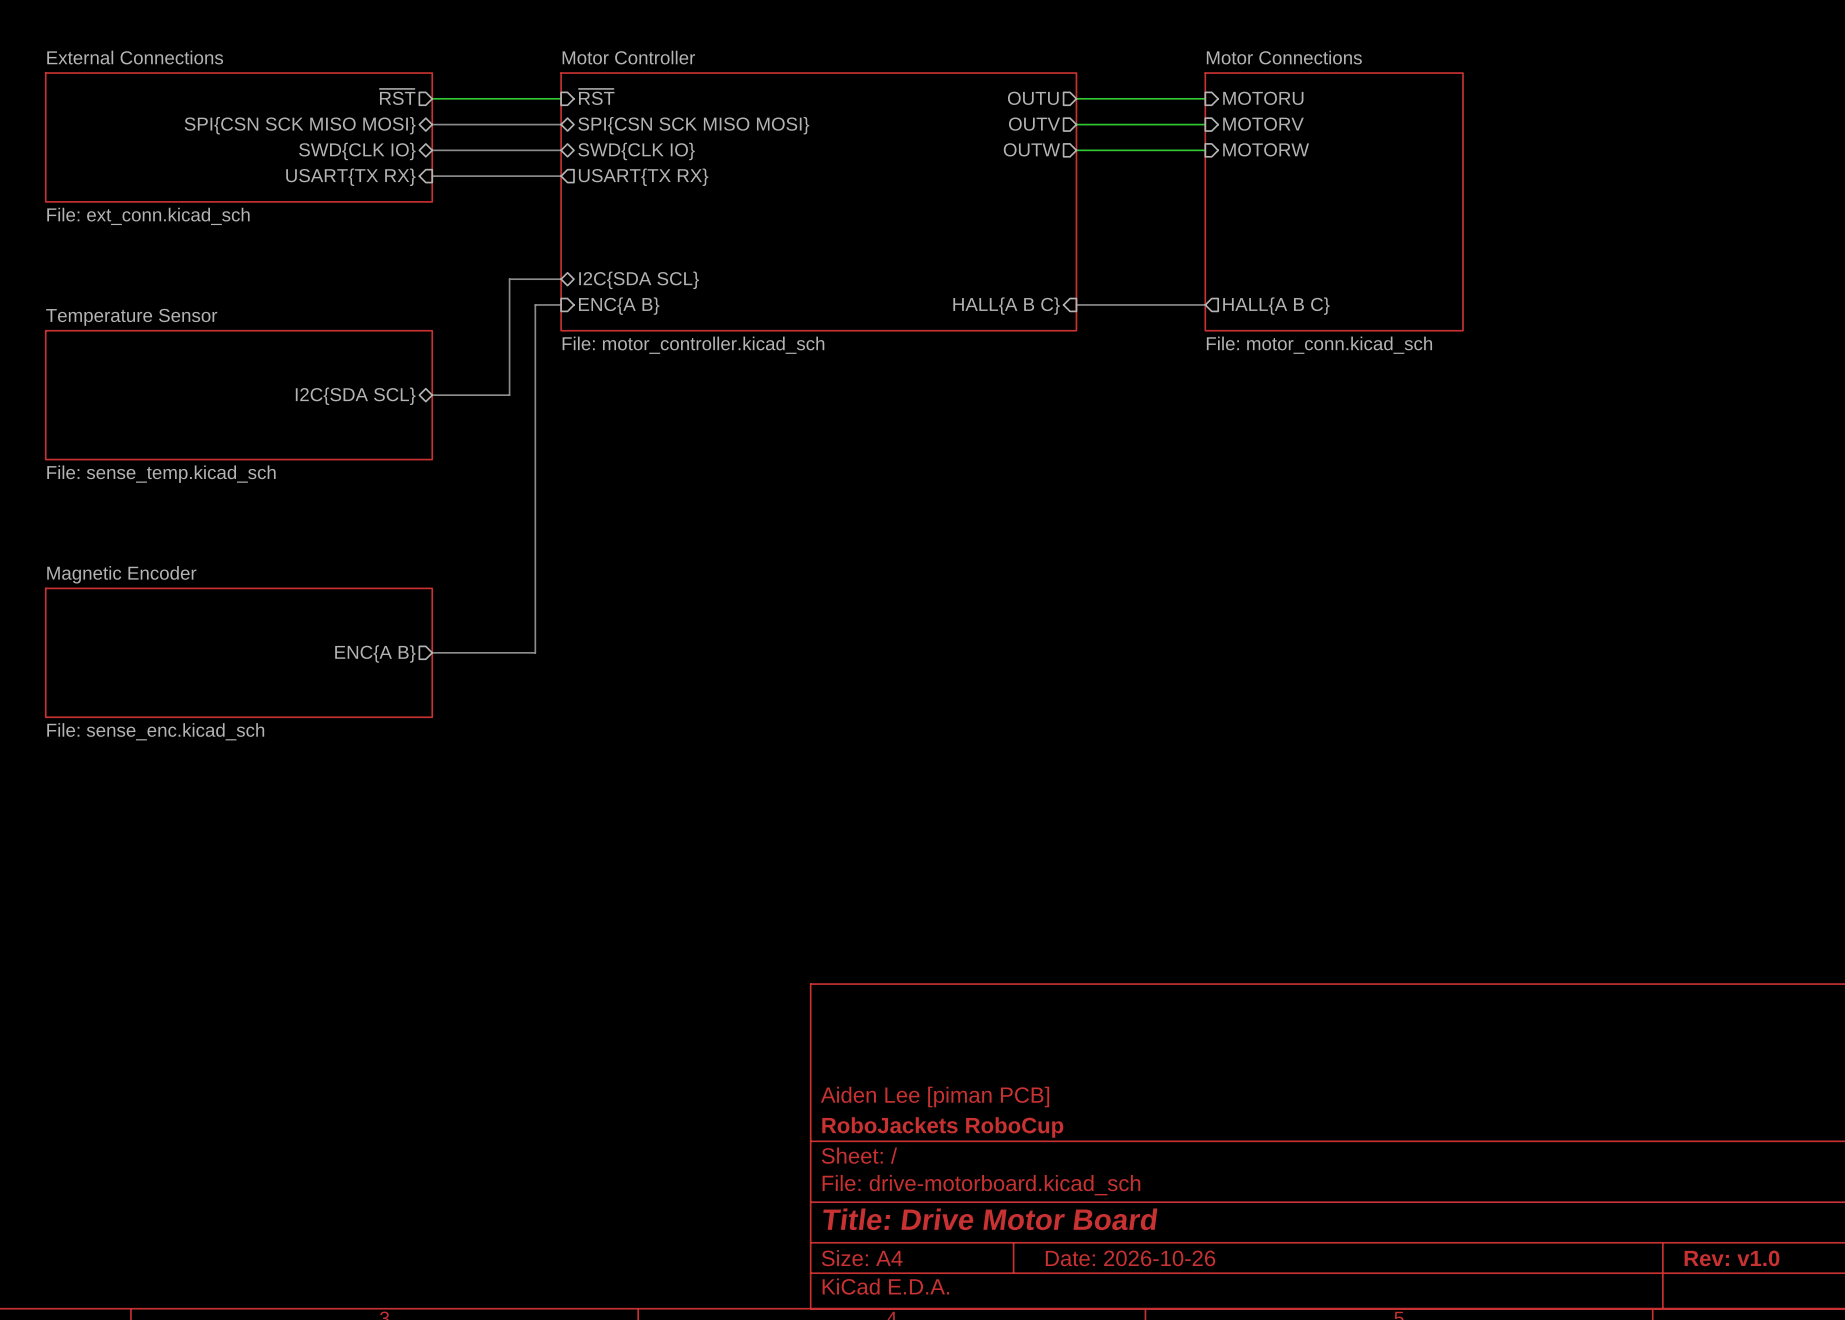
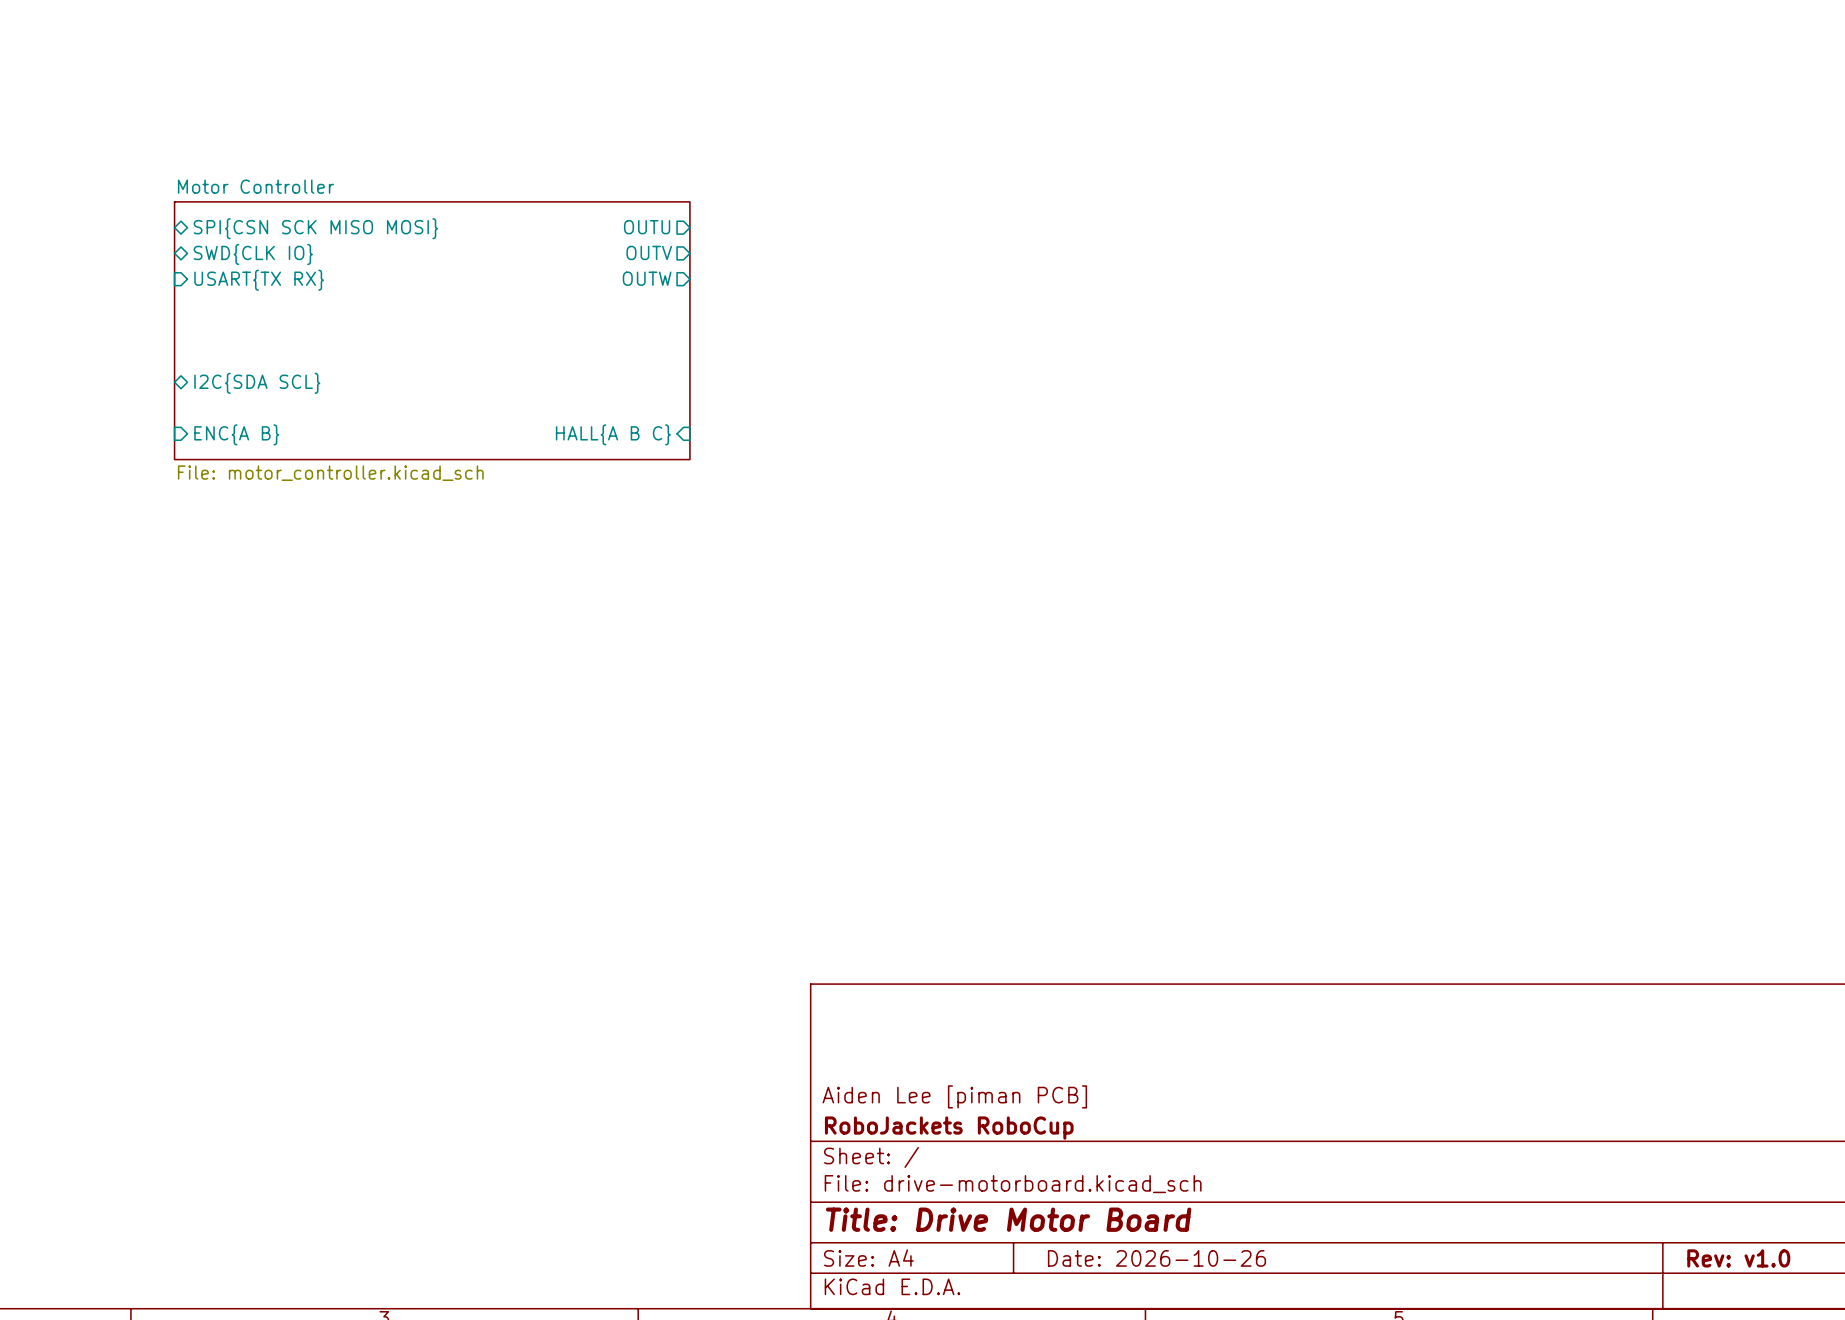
sheet pin: ~{RST} (397, 96) -> none
sheet pin: ~{RST} (596, 96) -> none
wire: (432, 98) (561, 98) -> none
sheet pin: OUTU (1033, 98) -> none
wire: (1076, 98) (1205, 98) -> none
sheet pin: MOTORU (1263, 98) -> none
bus: (432, 124) (561, 124) -> none
sheet pin: OUTV (1034, 124) -> none
wire: (1076, 124) (1205, 124) -> none
sheet pin: MOTORV (1263, 124) -> none
sheet pin: SPI{CSN SCK MISO MOSI} (300, 125) -> none
sheet pin: SPI{CSN SCK MISO MOSI} (693, 125) -> none
sheet External Connections: File: ext_conn.kicad_sch (238, 137) -> none
sheet pin: OUTW (1031, 149) -> none
sheet pin: MOTORW (1266, 149) -> none
bus: (432, 150) (561, 150) -> none
wire: (1076, 150) (1205, 150) -> none
sheet pin: SWD{CLK IO} (357, 151) -> none
sheet pin: SWD{CLK IO} (636, 151) -> none
bus: (432, 176) (561, 176) -> none
sheet pin: USART{TX RX} (350, 177) -> none
sheet pin: USART{TX RX} (643, 177) -> none
sheet Motor Controller: File: motor_controller.kicad_sch (818, 201) -> none
sheet Motor Connections: File: motor_conn.kicad_sch (1334, 201) -> none
sheet pin: none -> OUTU (647, 227)
sheet pin: none -> SPI{CSN SCK MISO MOSI} (315, 228)
sheet pin: none -> OUTV (649, 252)
sheet pin: none -> SWD{CLK IO} (253, 254)
sheet pin: none -> OUTW (647, 278)
bus: (561, 279) (509, 279) (509, 395) (432, 395) -> none
sheet pin: none -> USART{TX RX} (259, 280)
sheet pin: I2C{SDA SCL} (639, 280) -> none
bus: (561, 304) (535, 304) (535, 652) (432, 652) -> none
bus: (1076, 304) (1205, 304) -> none
sheet pin: ENC{A B} (619, 306) -> none
sheet pin: HALL{A B C} (1006, 306) -> none
sheet pin: HALL{A B C} (1276, 306) -> none
sheet Motor Controller: none -> File: motor_controller.kicad_sch (432, 330)
sheet Temperature Sensor: File: sense_temp.kicad_sch (238, 395) -> none
sheet pin rotation: 0° (355, 396) -> 180° (257, 383)
sheet pin: none -> ENC{A B} (236, 434)
sheet pin: none -> HALL{A B C} (613, 434)
sheet Magnetic Encoder: File: sense_enc.kicad_sch (238, 652) -> none
sheet pin: ENC{A B} (375, 653) -> none

